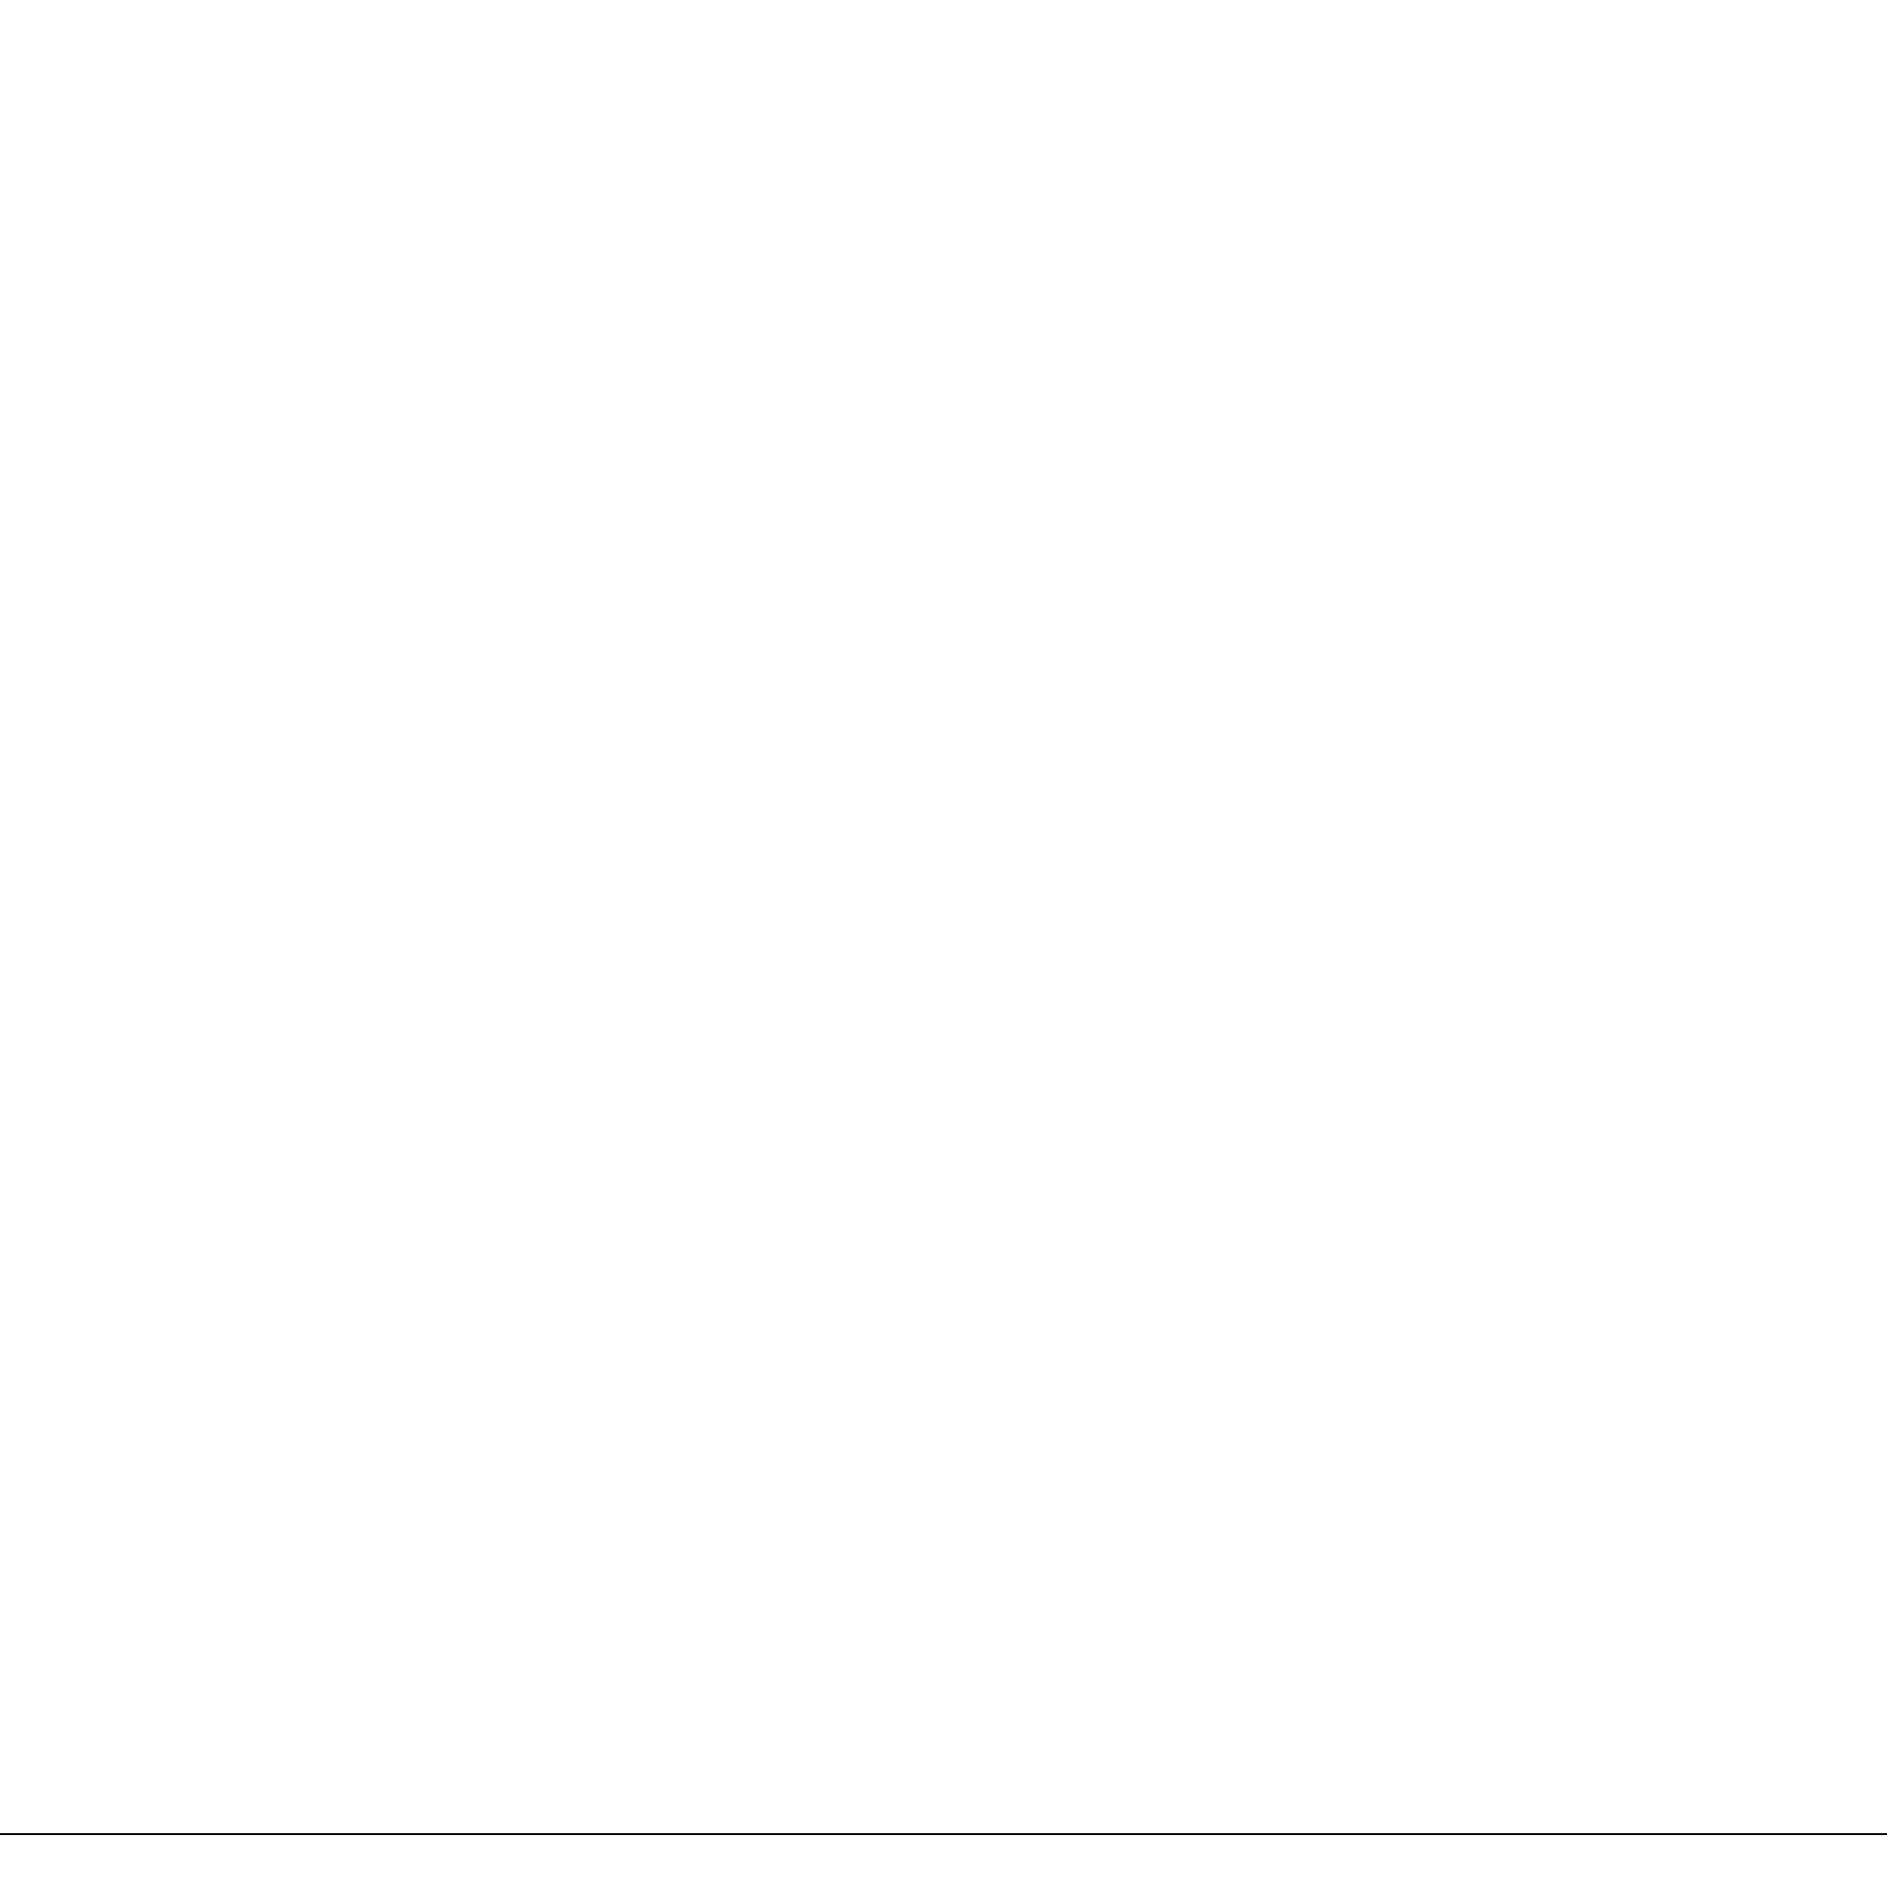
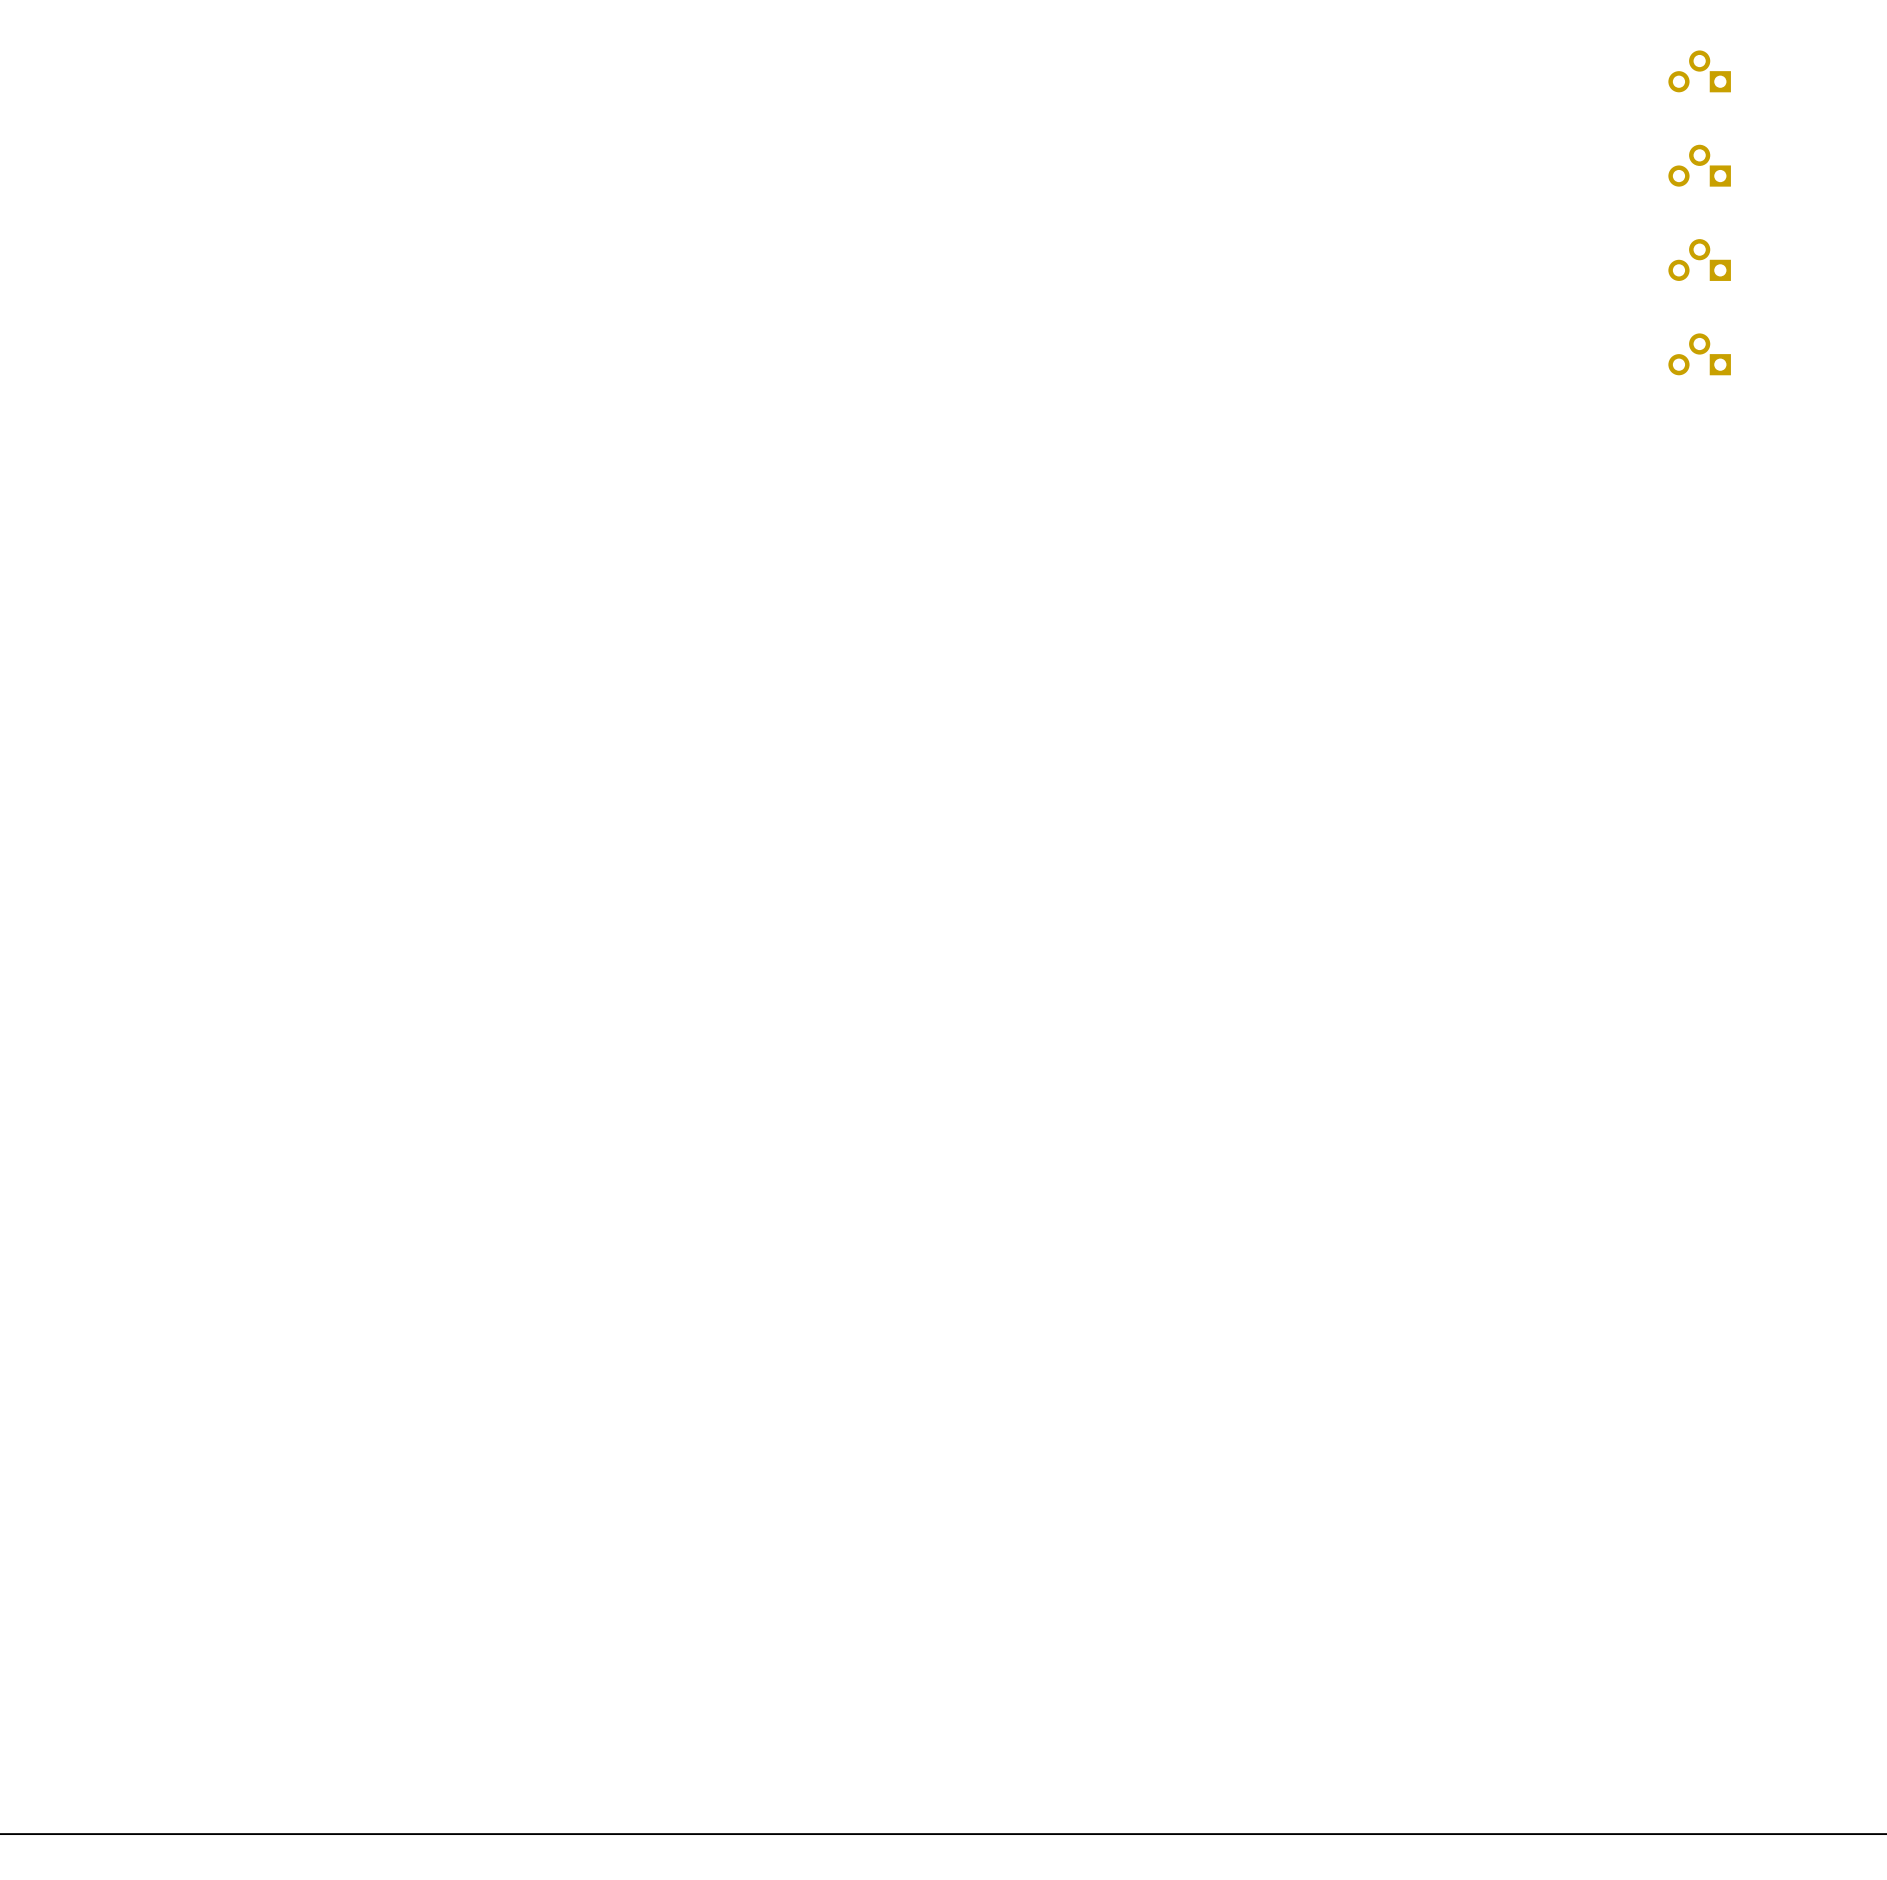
part: none -> (1699, 71)
part: none -> (1699, 165)
part: none -> (1699, 260)
part: none -> (1699, 354)

